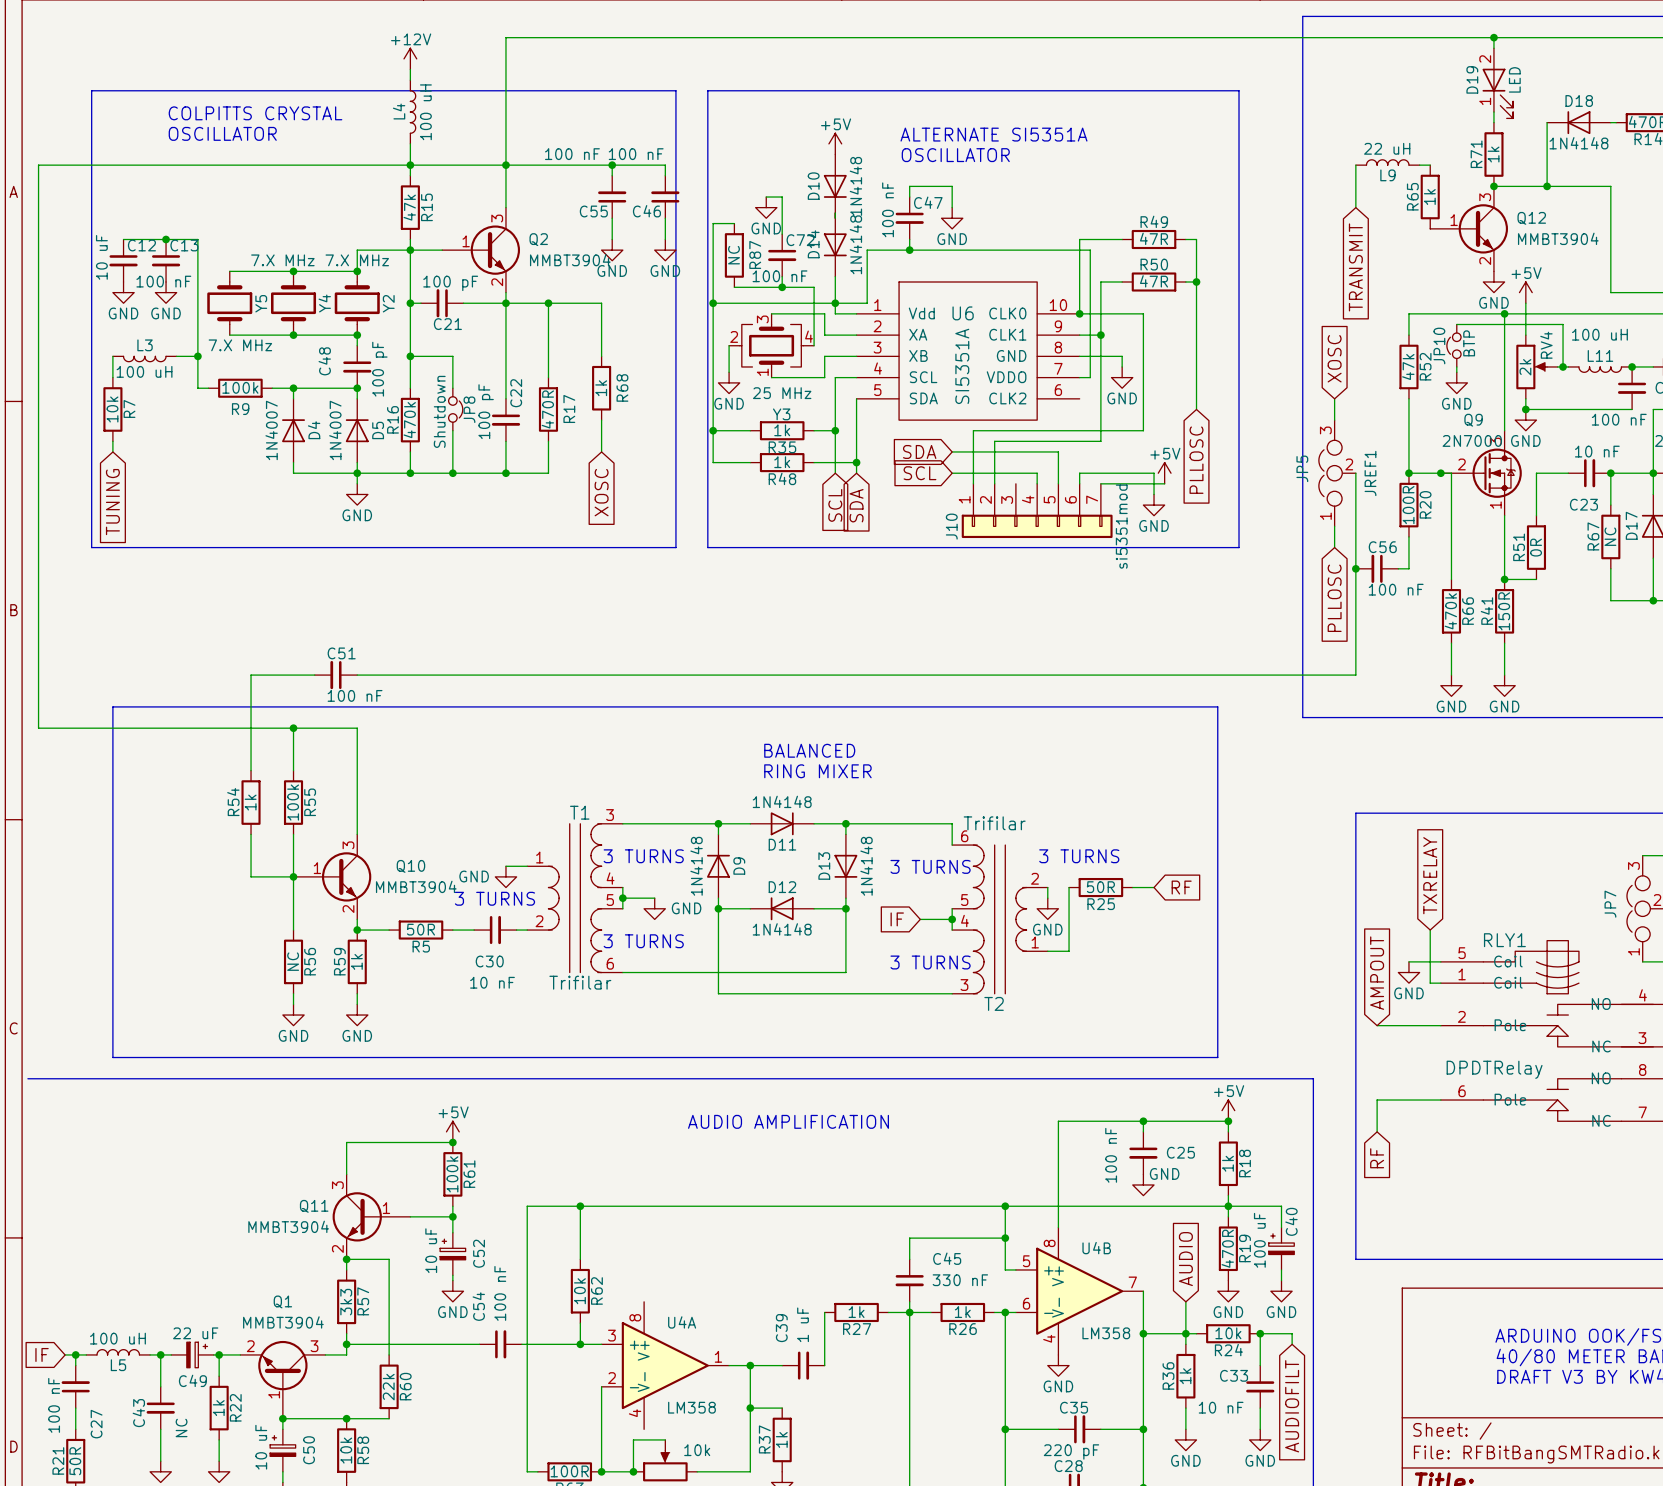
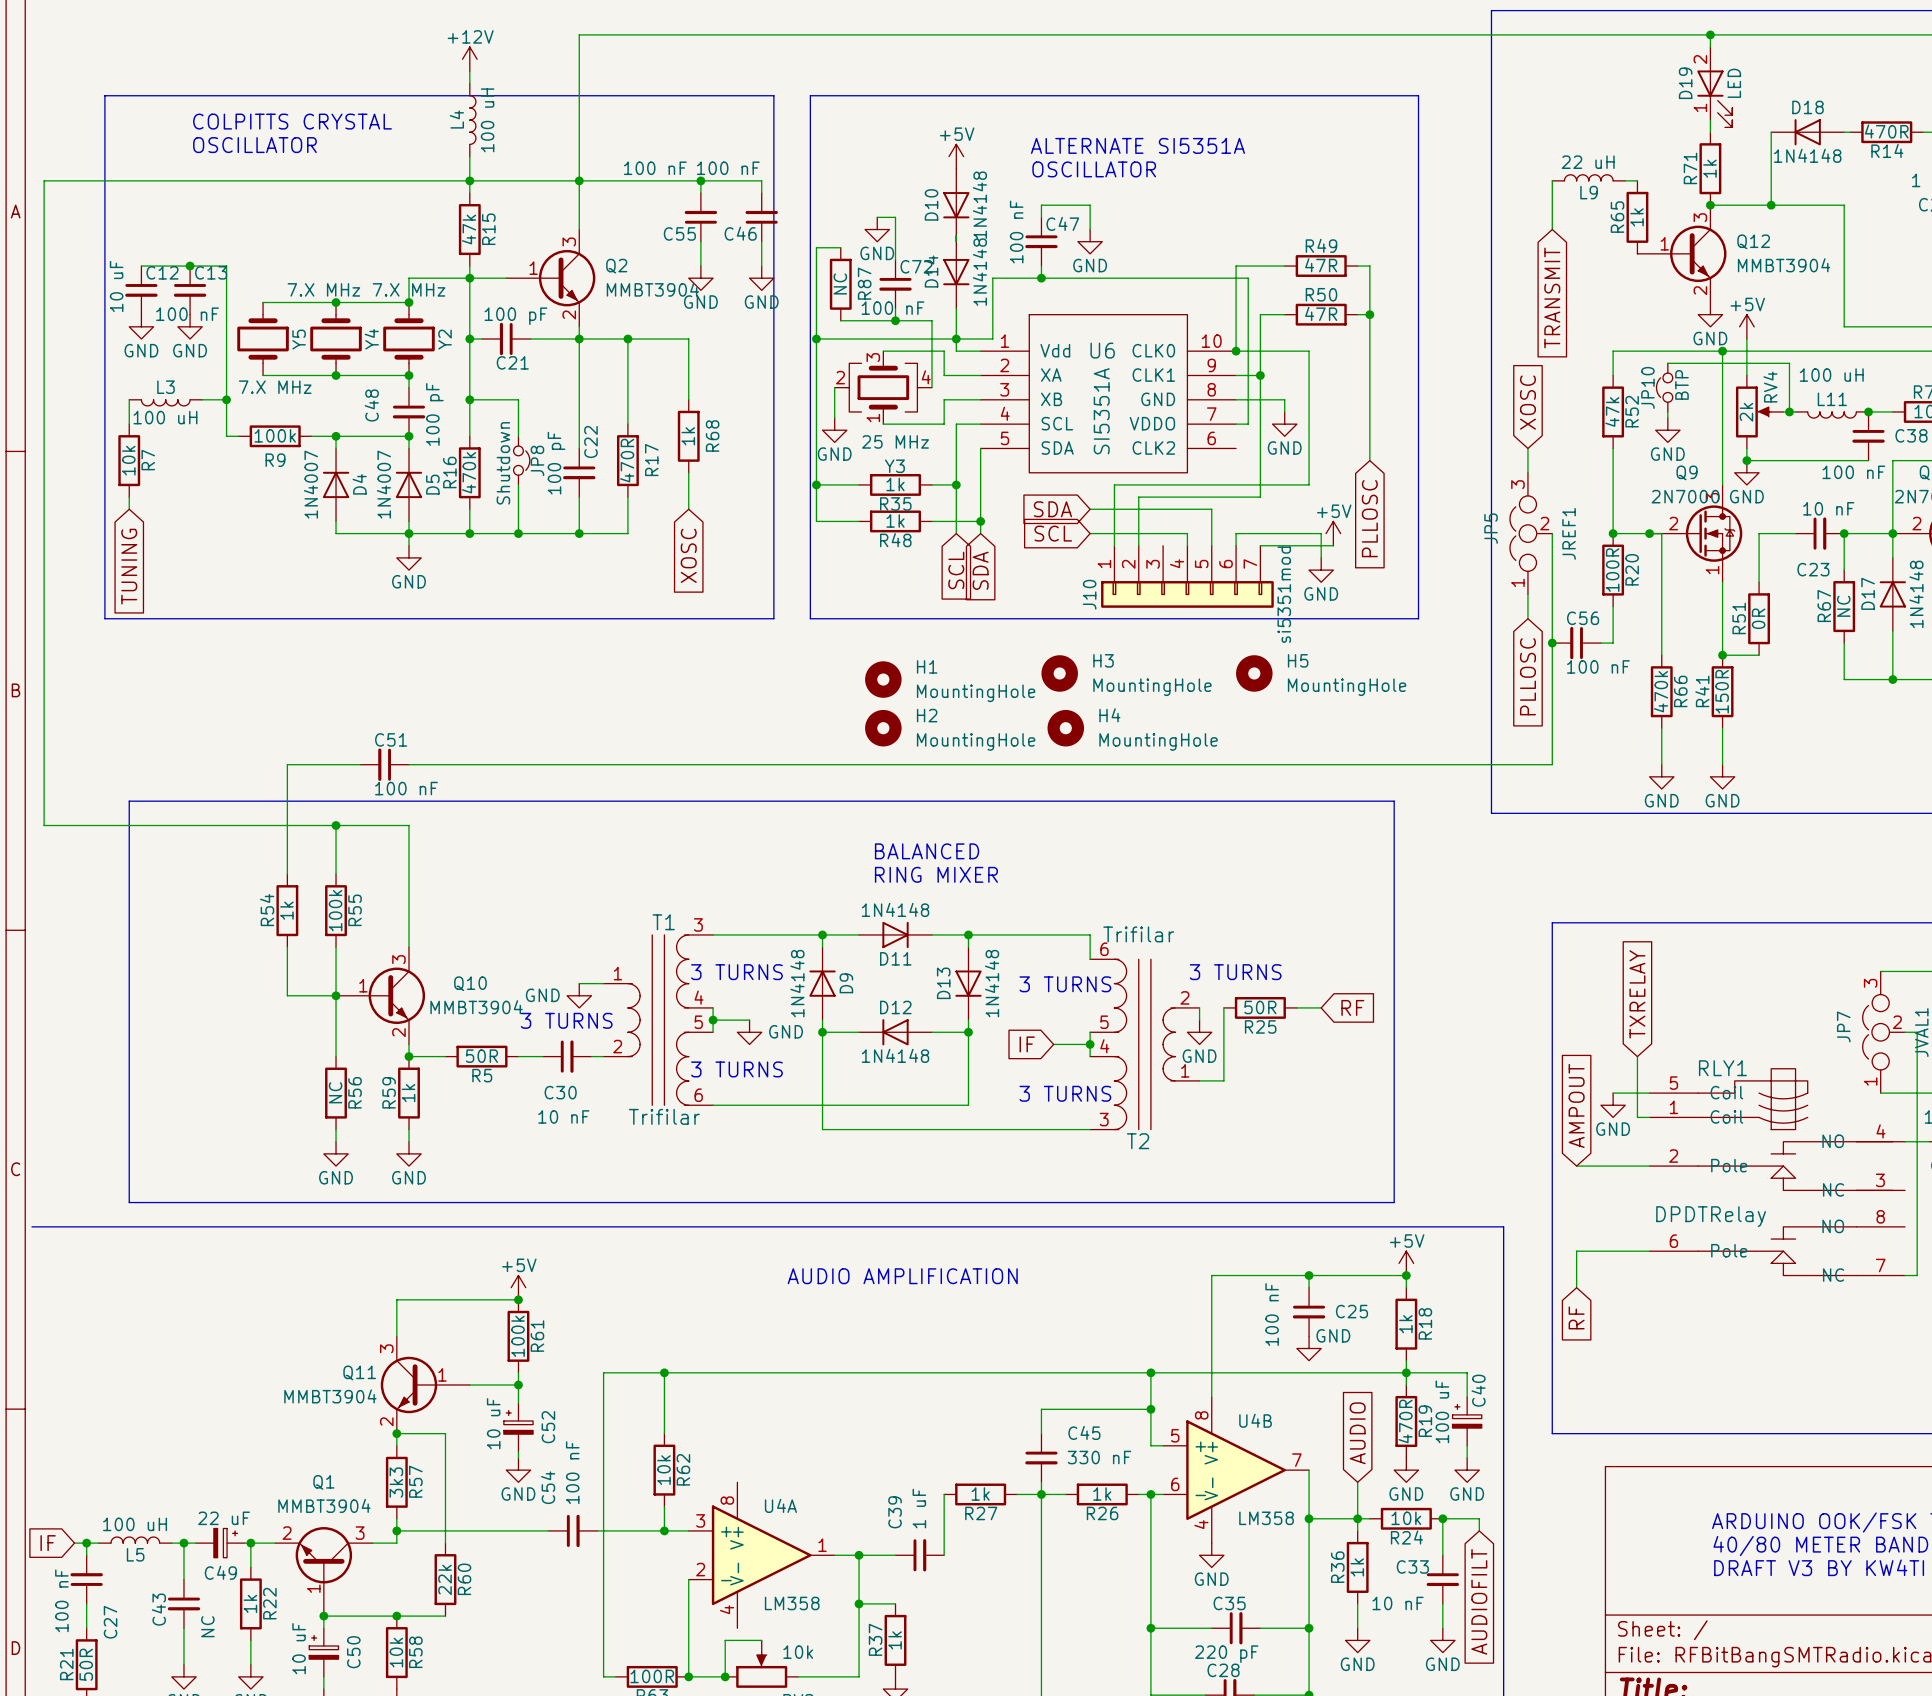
H3: none -> MountingHole (1059, 673)
H5: none -> MountingHole (1254, 673)
H1: none -> MountingHole (883, 679)
H2: none -> MountingHole (883, 728)
H4: none -> MountingHole (1065, 728)

